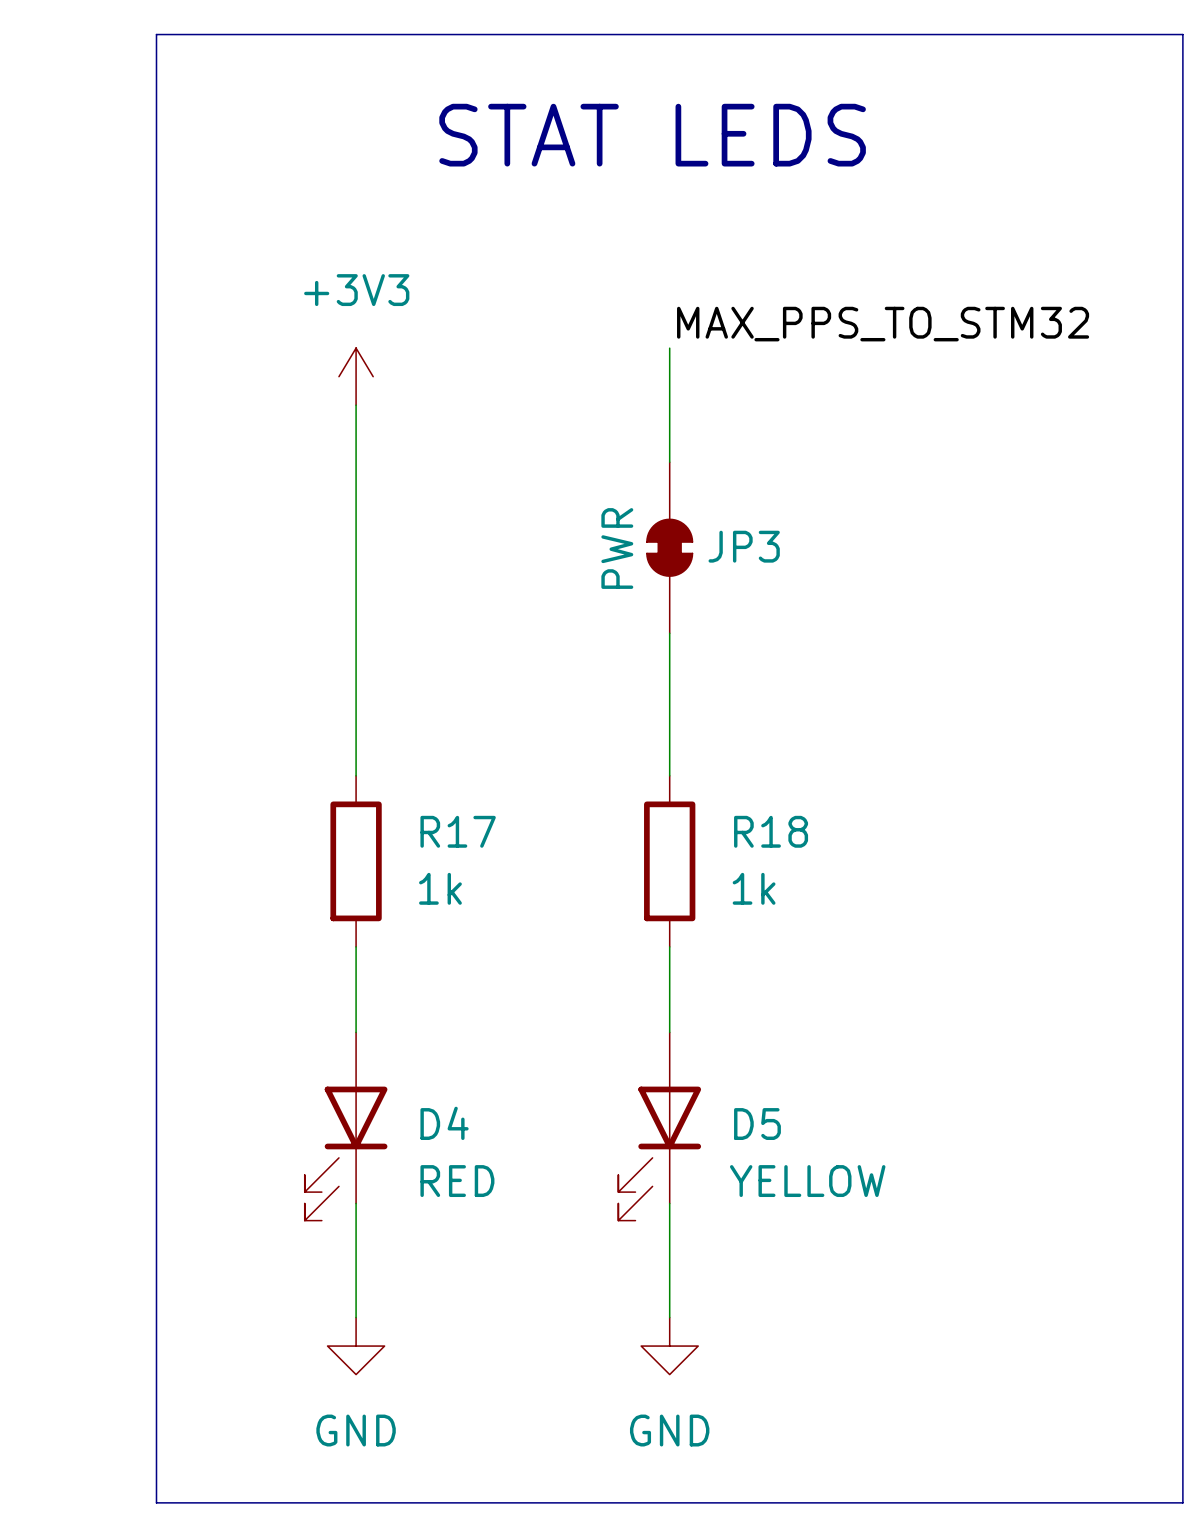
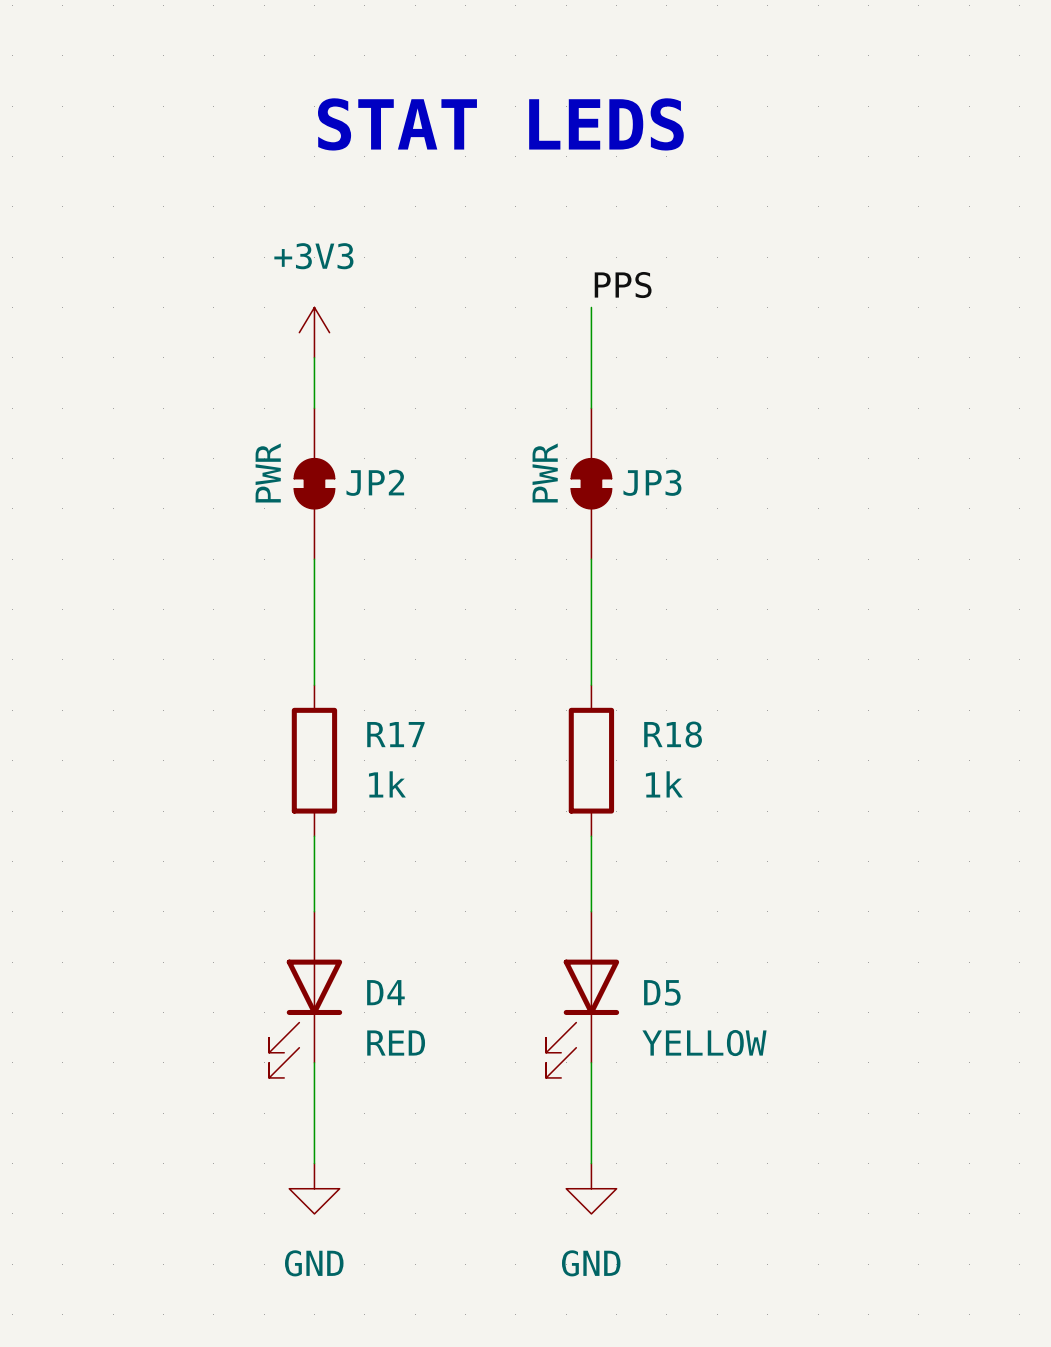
line: (156, 34) (1182, 34) (1182, 1502) (156, 1502) (156, 34) -> none
text position: STAT LEDS (652, 135) -> STAT LEDS (500, 124)
label: MAX_PPS_TO_STM32 (883, 324) -> PPS (623, 285)
JP2: none -> PWR (314, 483)

